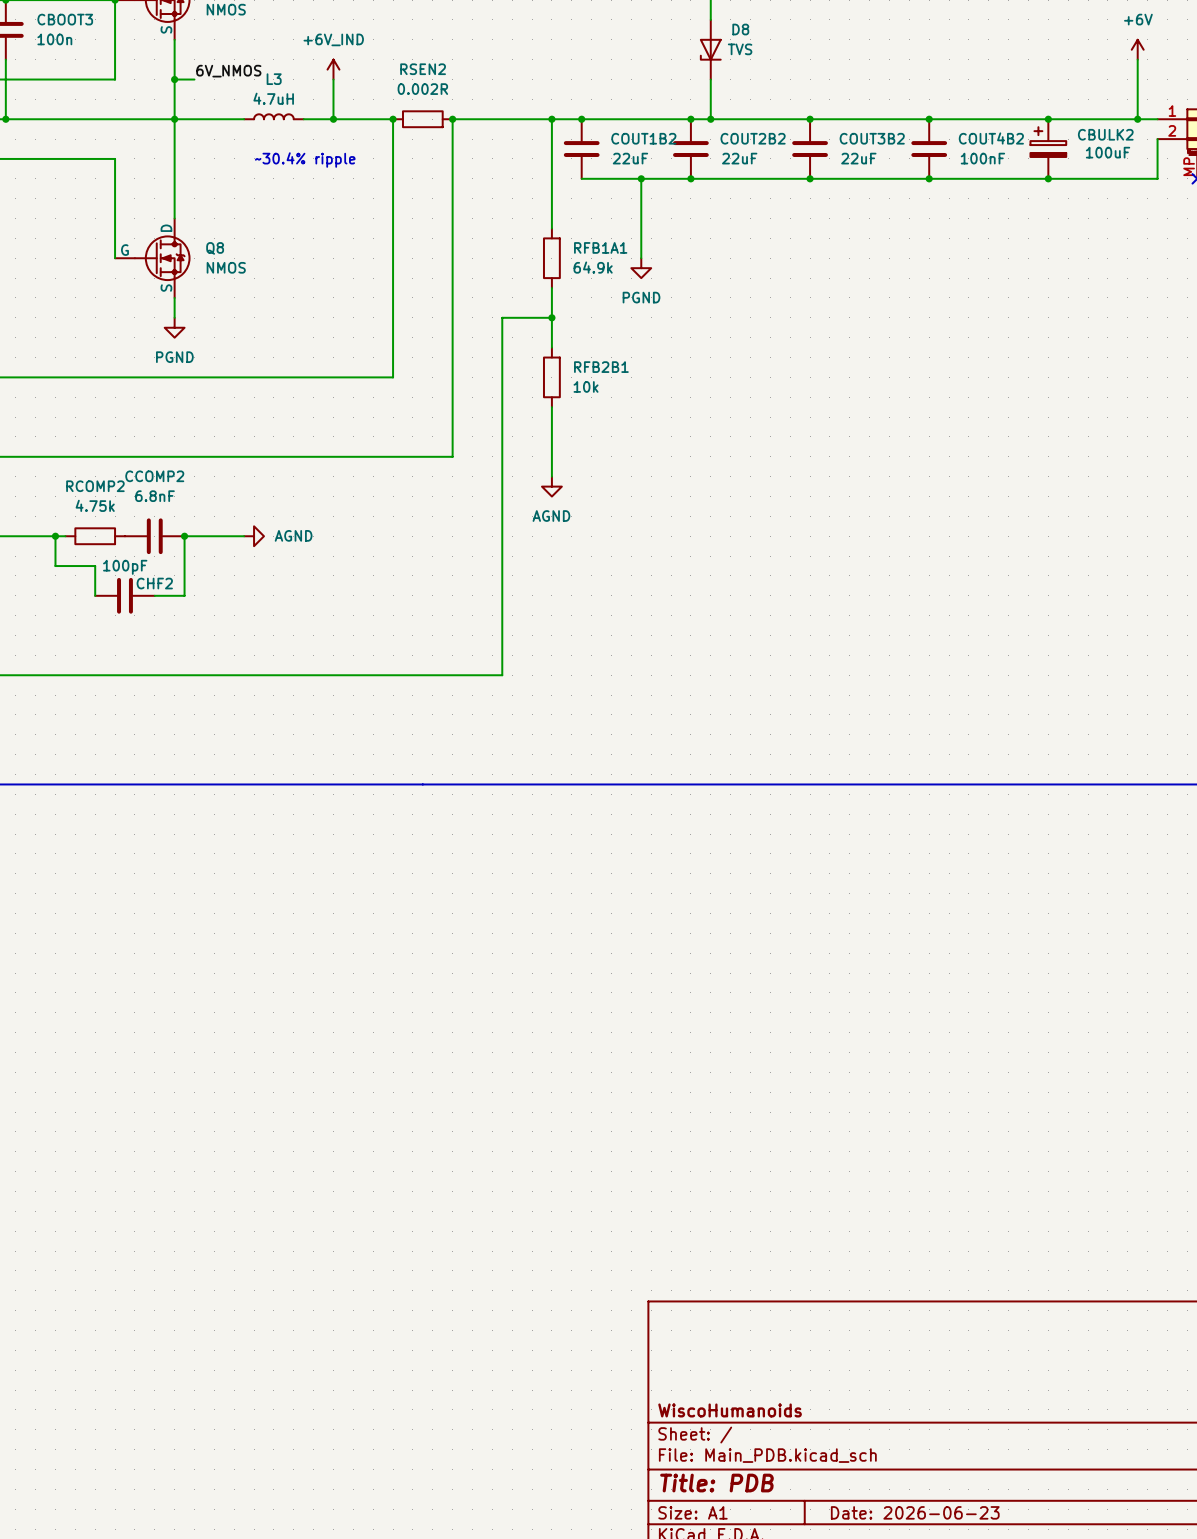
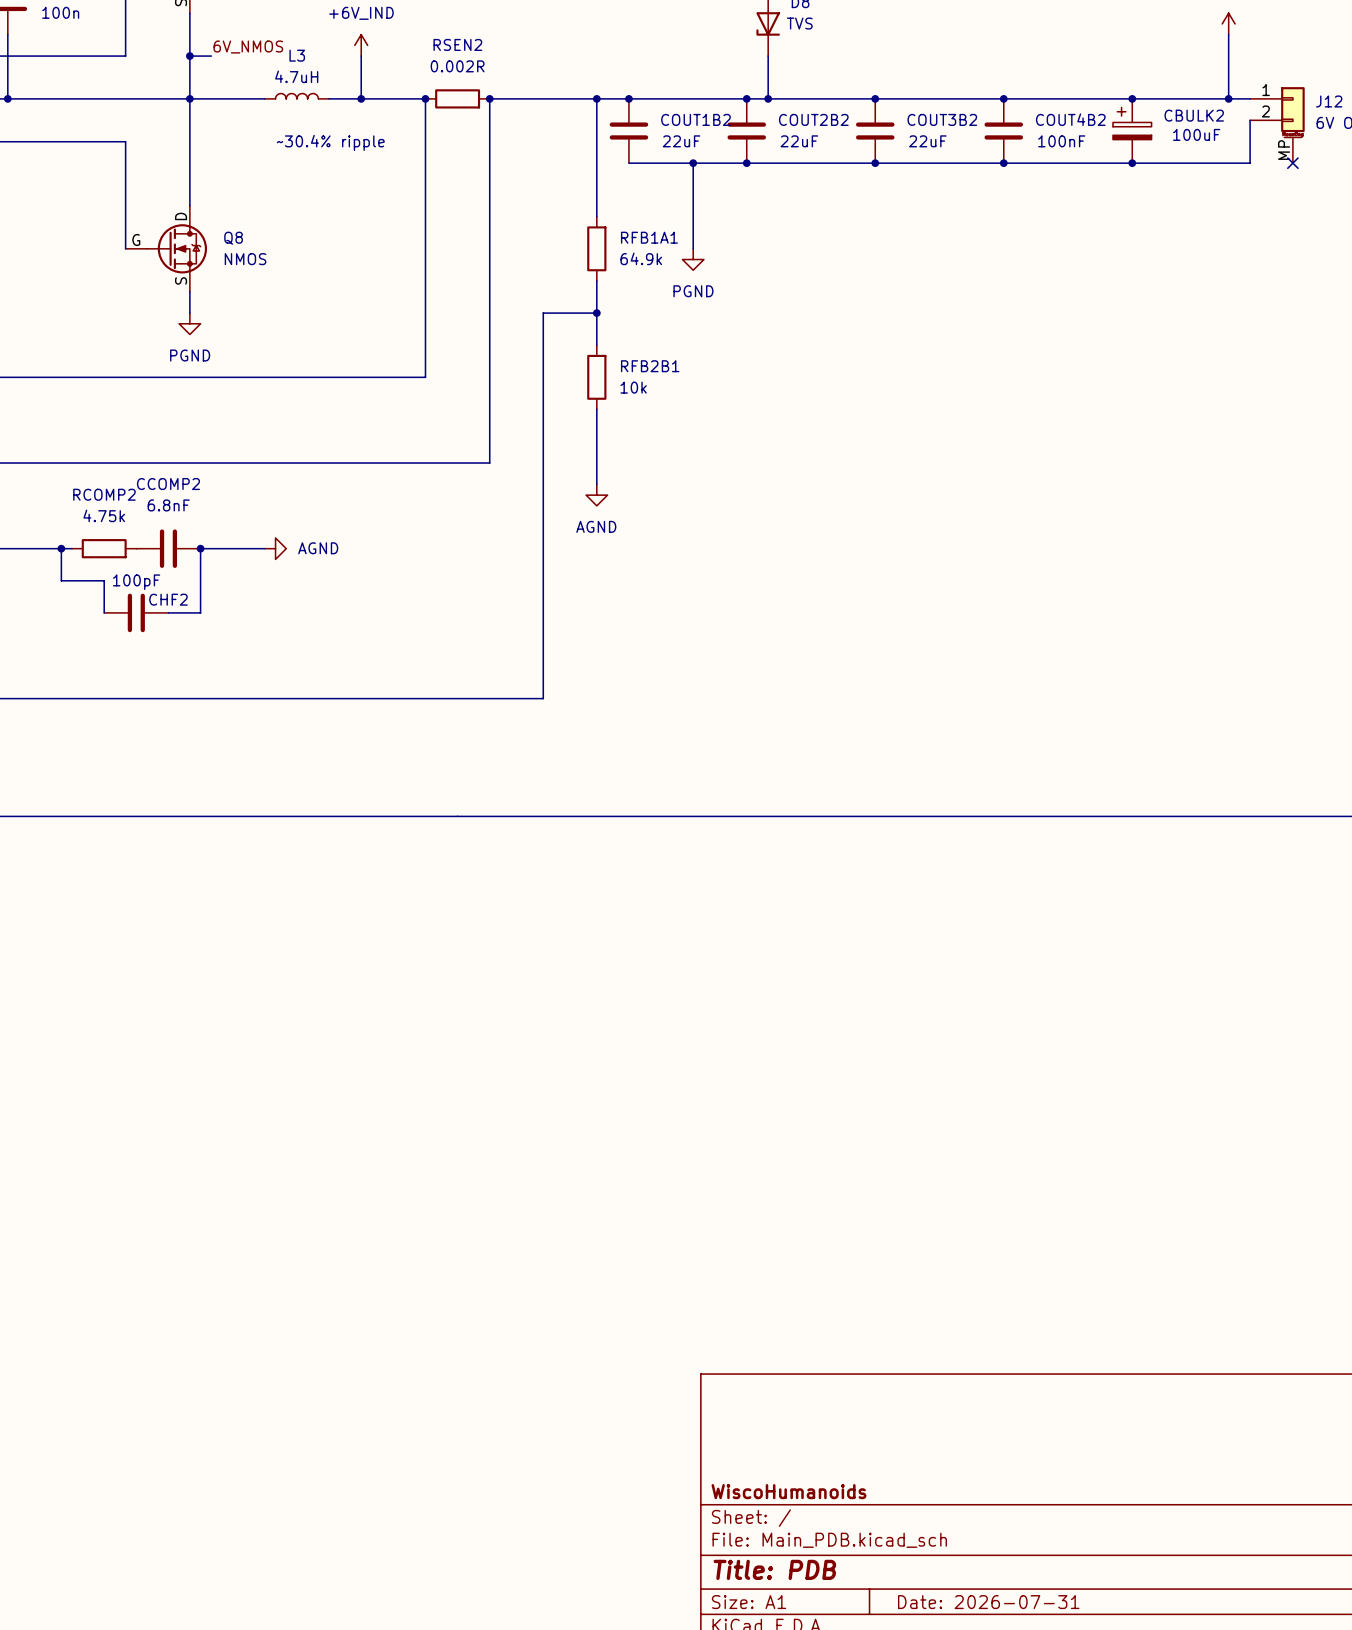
title block: Date: 2026-06-23 (915, 1512) -> Date: 2026-07-31 (988, 1602)

